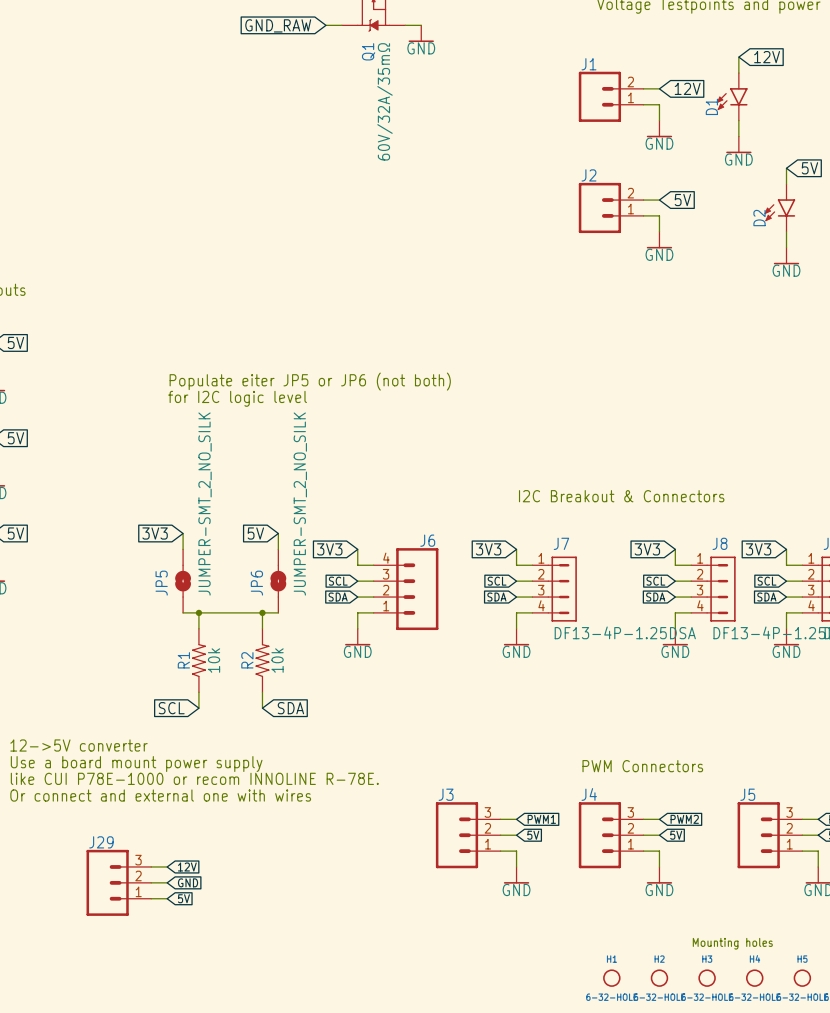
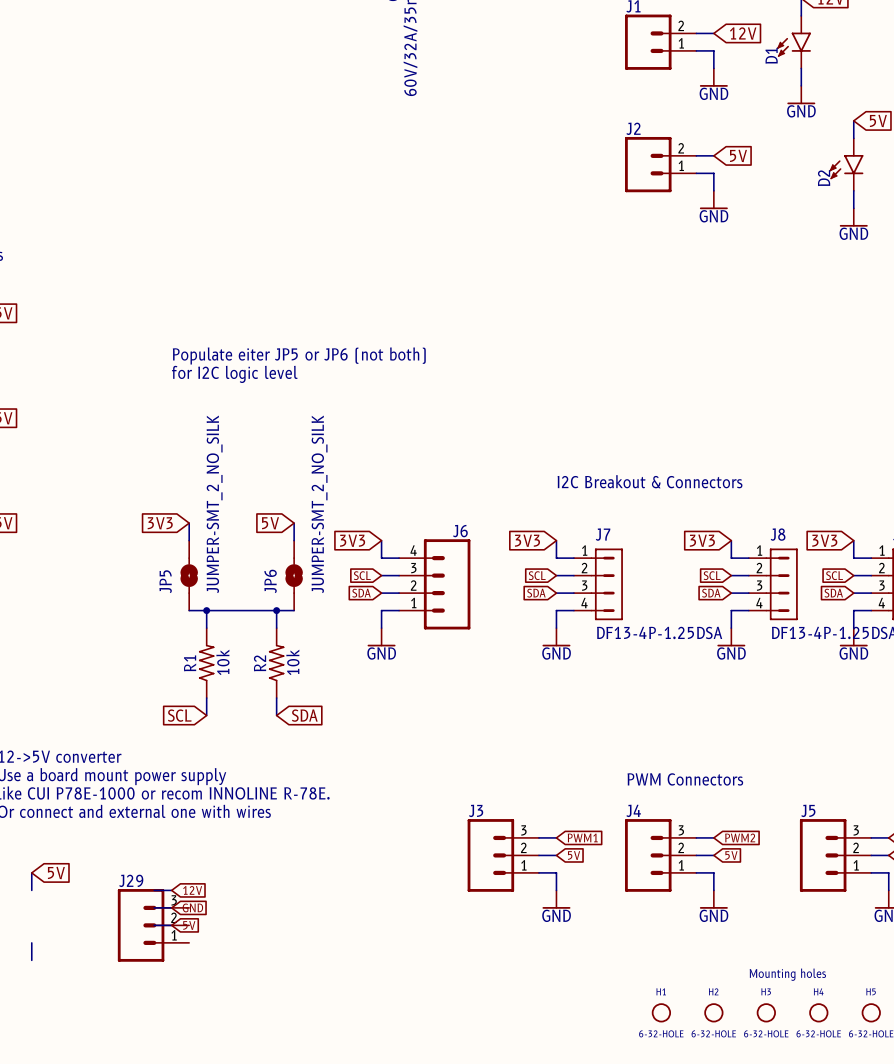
wire: none -> (31, 872) (31, 890)
global label: none -> 5V (56, 873)
J29 position: (118, 882) -> (153, 925)
wire: none -> (31, 942) (31, 960)

